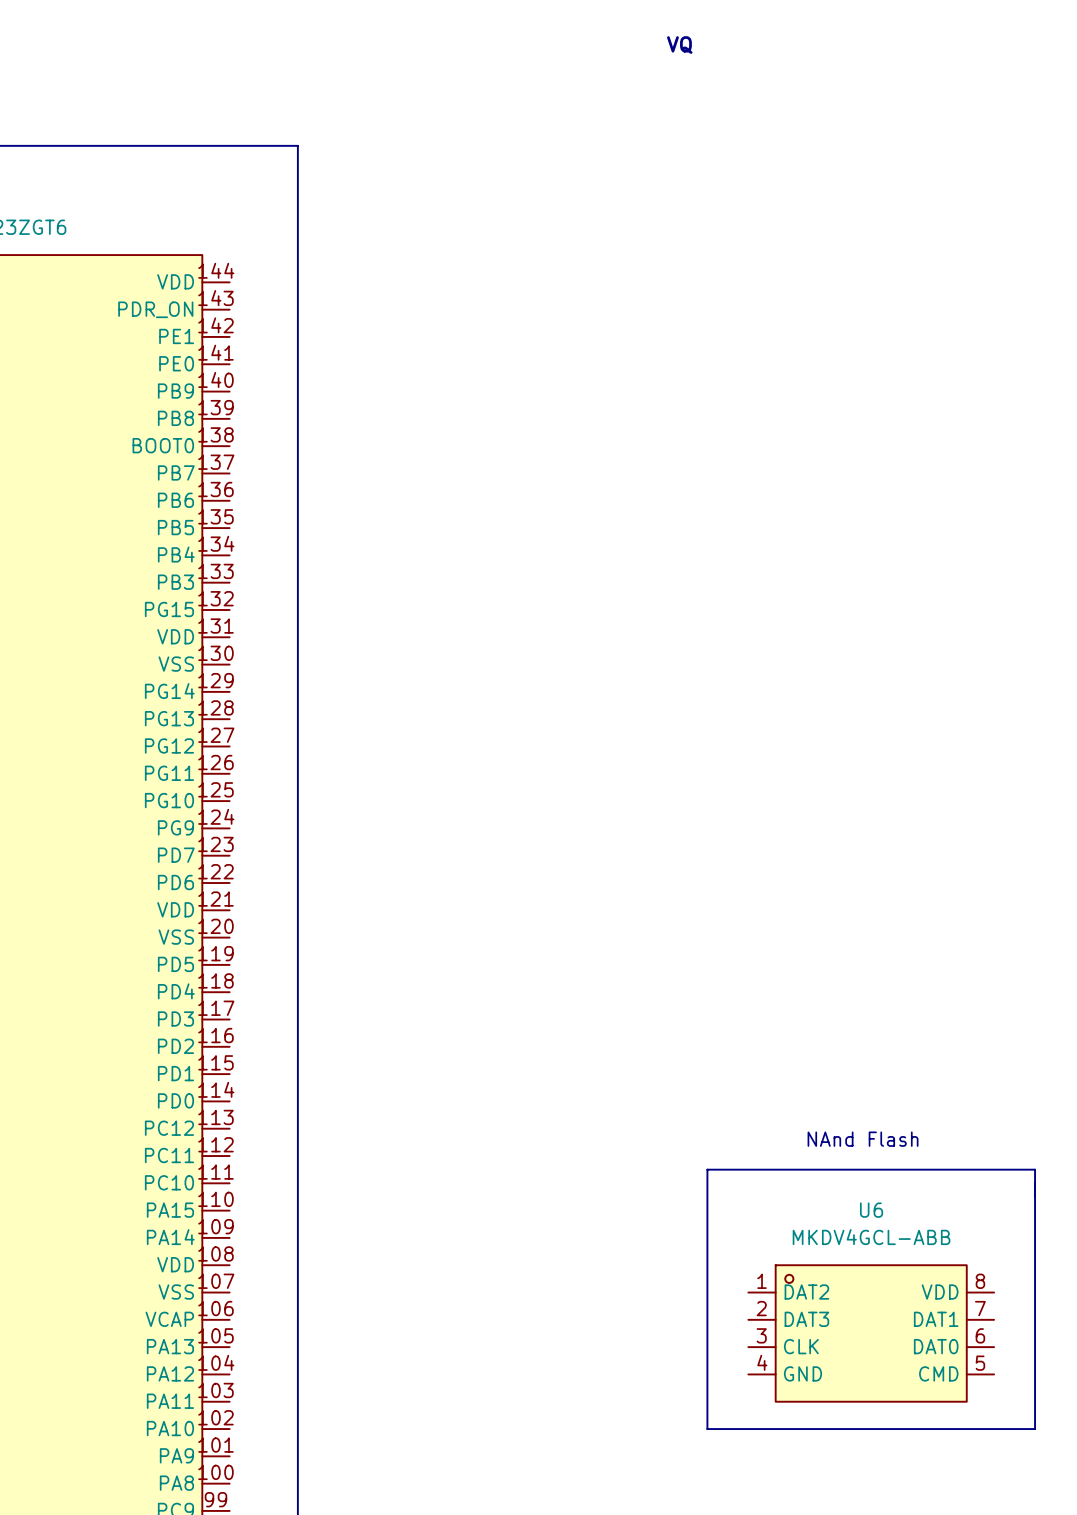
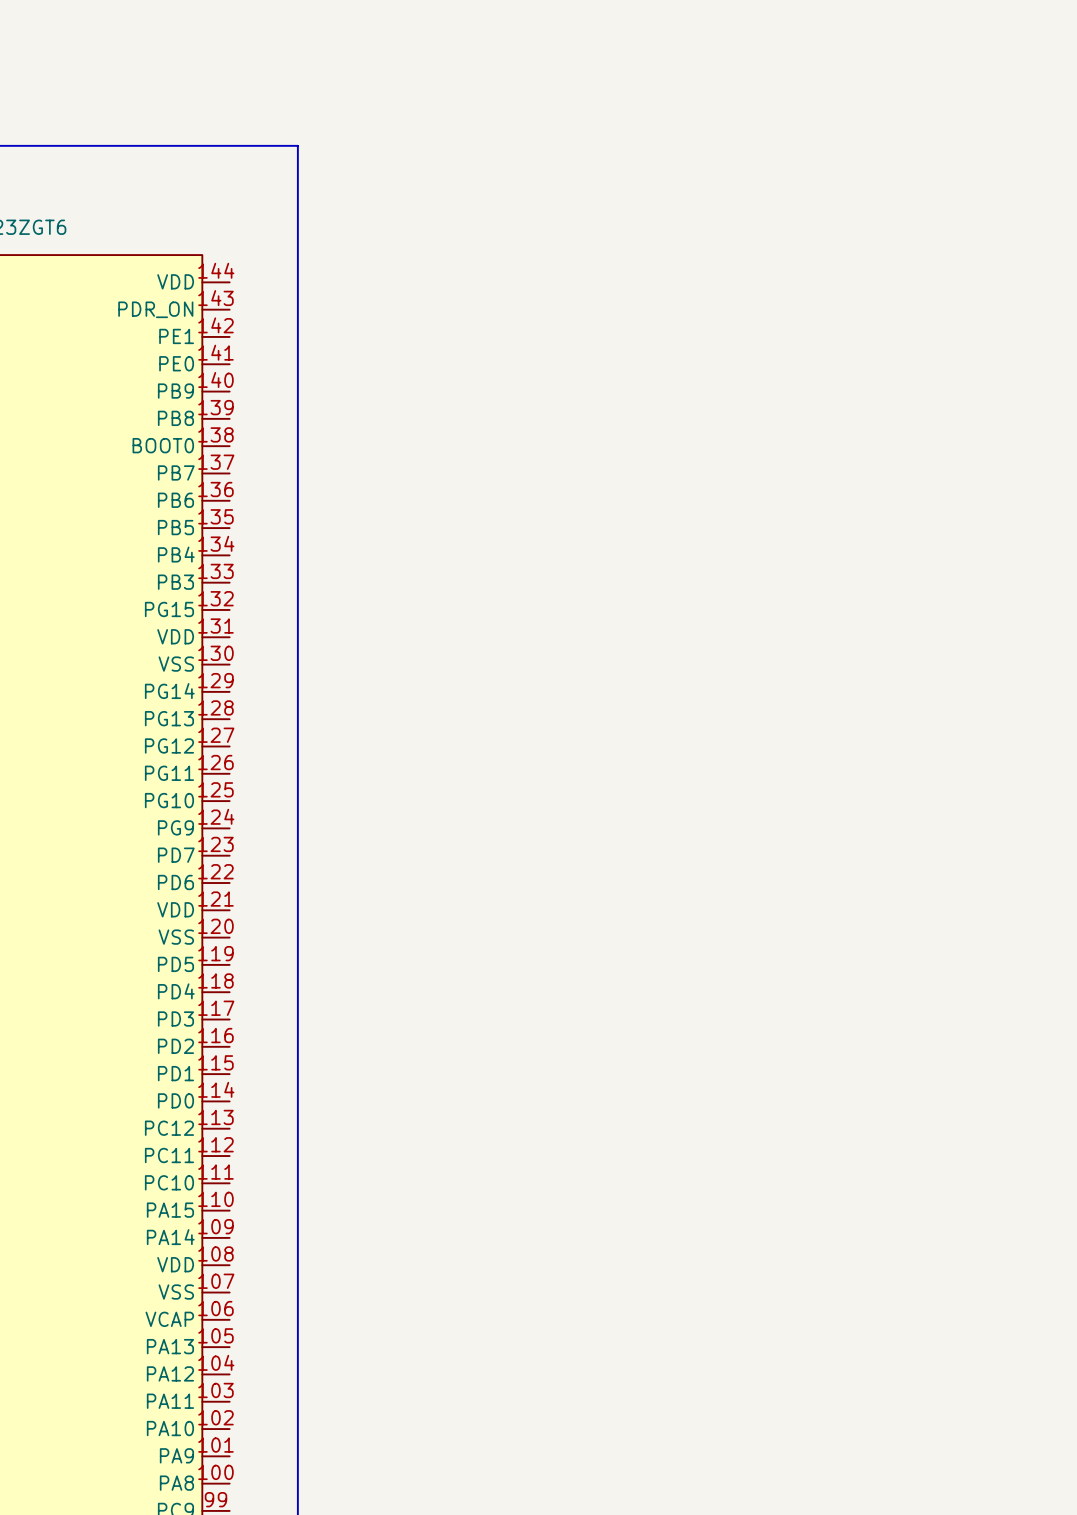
text: VQ (679, 45) -> none
text: NAnd Flash (863, 1139) -> none
line: (707, 1169) (707, 1429) (1035, 1429) (1035, 1169) (707, 1169) -> none
U6: MKDV4GCL-ABB (871, 1333) -> none

